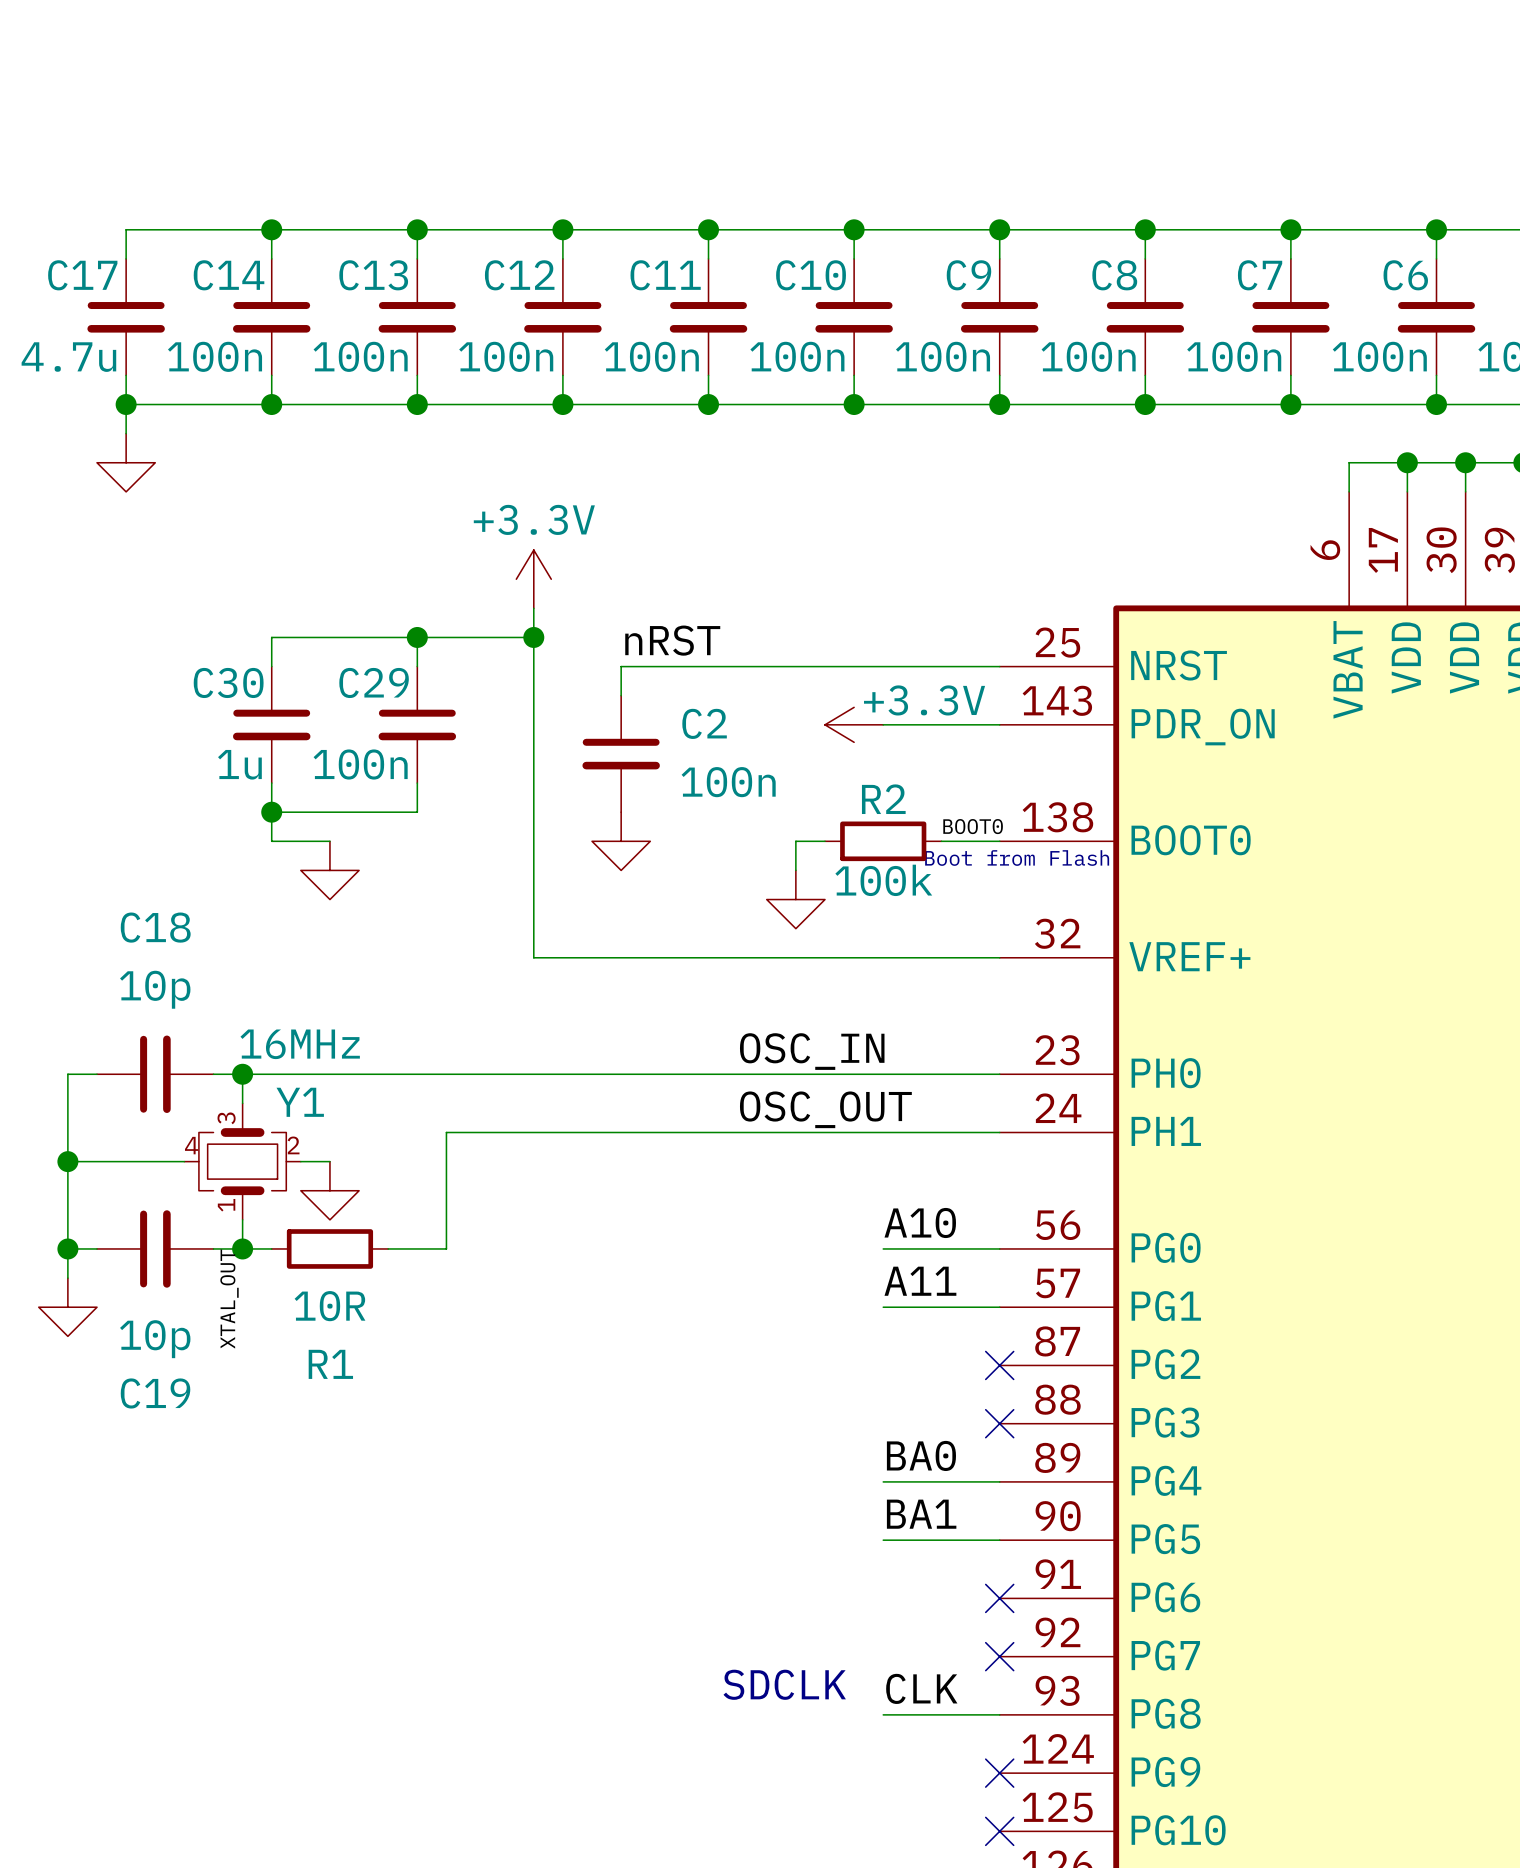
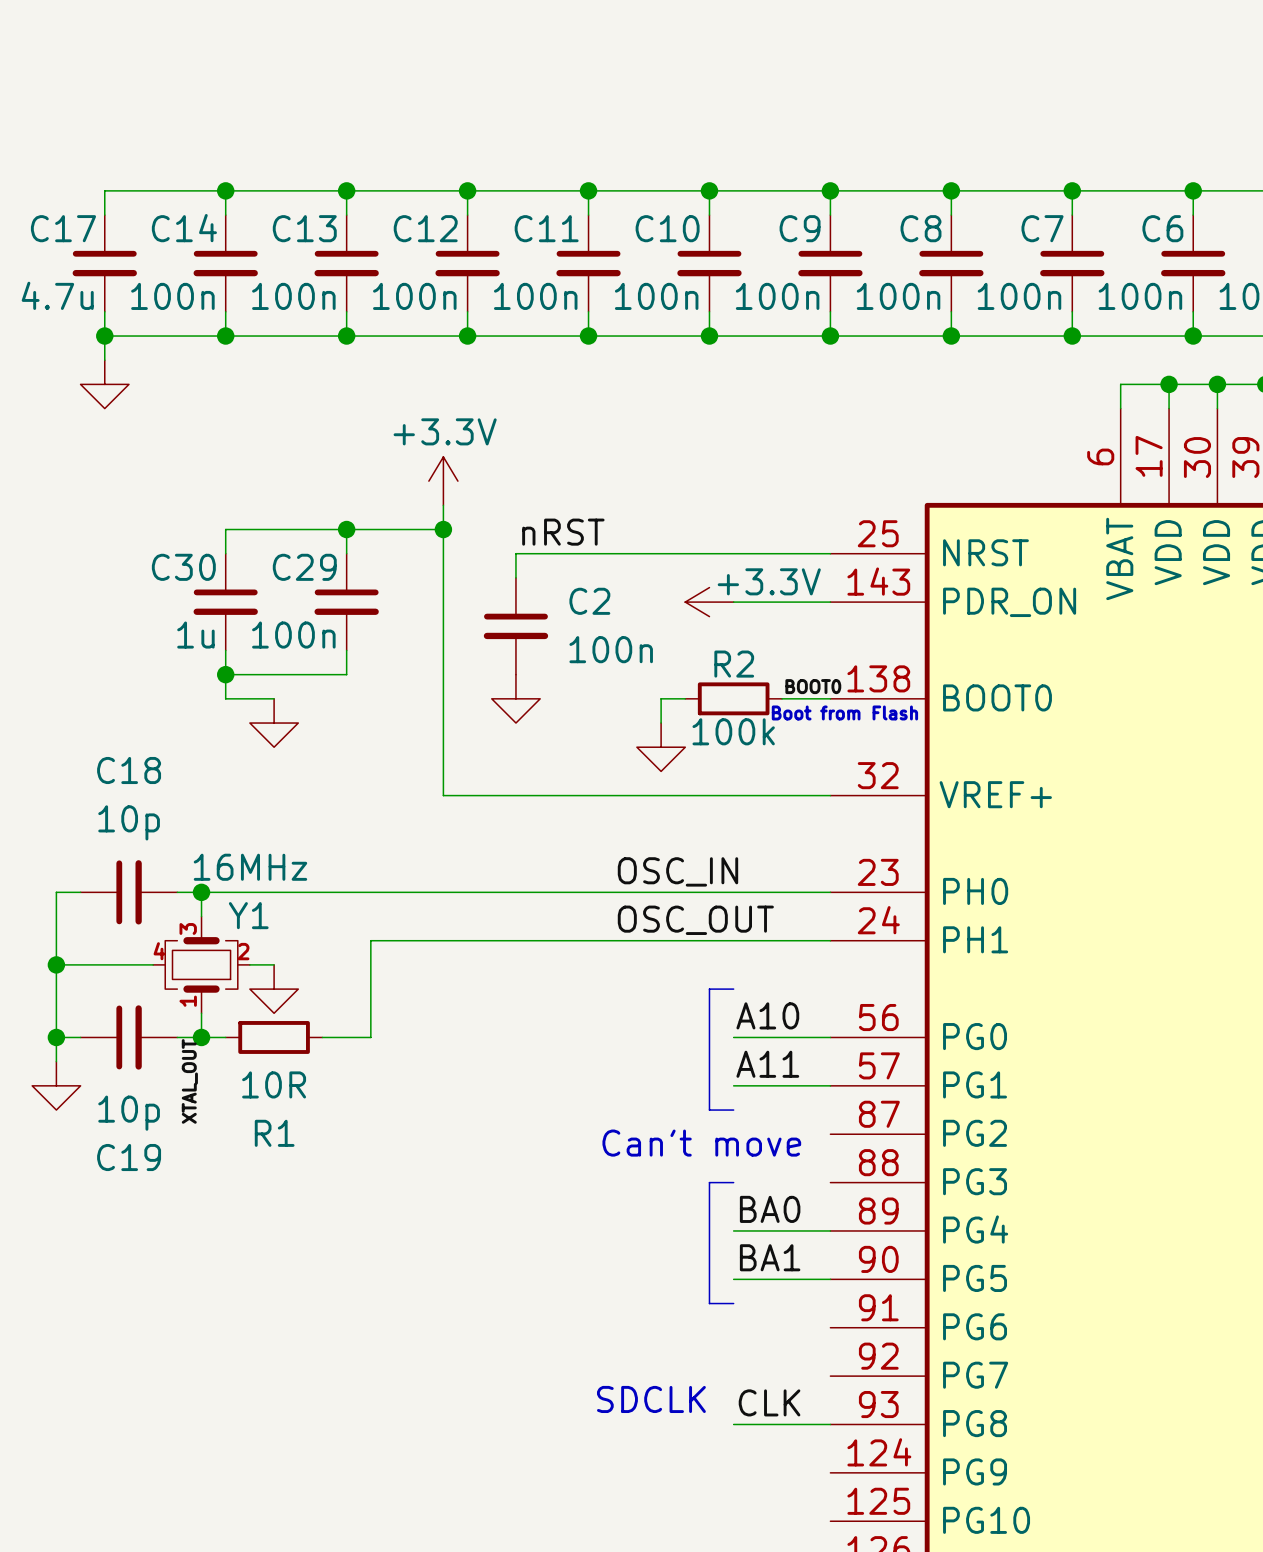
line: none -> (733, 989) (709, 989) (709, 1110) (733, 1110)
no-connect mark: (999, 1365) -> none
text: none -> Can't move (701, 1143)
line: none -> (733, 1182) (709, 1182) (709, 1303) (733, 1303)
no-connect mark: (999, 1423) -> none
no-connect mark: (999, 1598) -> none
no-connect mark: (999, 1656) -> none
no-connect mark: (999, 1773) -> none
no-connect mark: (999, 1831) -> none

